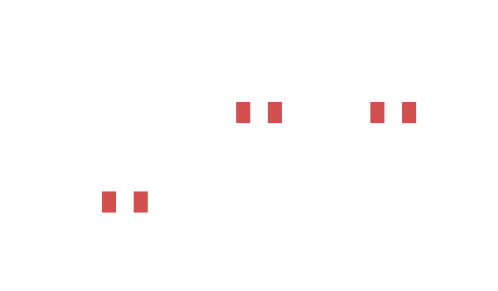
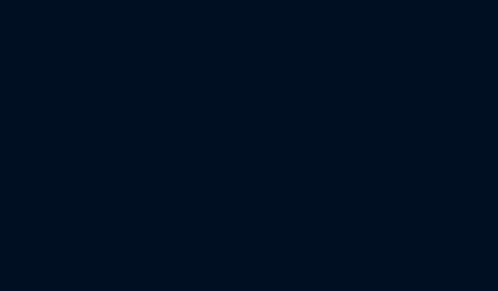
part: (259, 112) -> none
part: (393, 112) -> none
part: (124, 201) -> none

